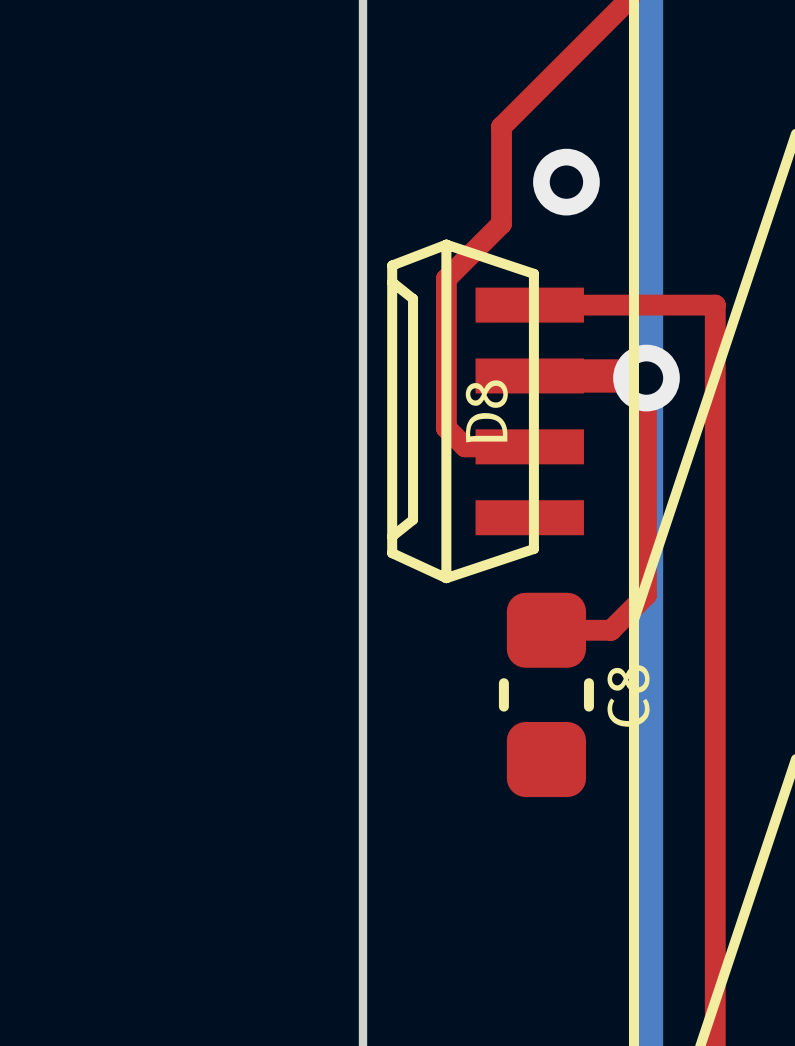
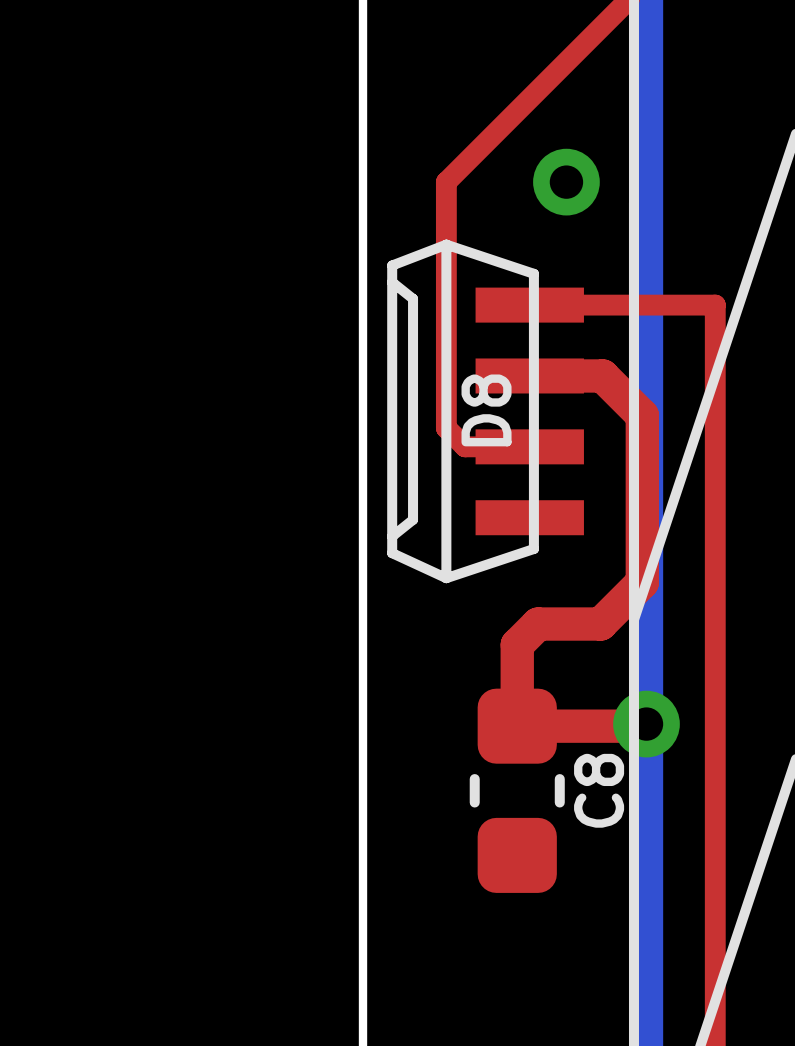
top track: (501, 126) (501, 223) (446, 278) -> (501, 126) (446, 182) (446, 278)
top track: (602, 375) (644, 375) (646, 378) (646, 594) (611, 630) (546, 630) -> (602, 375) (642, 415) (642, 582) (600, 624) (538, 624) (517, 644) (517, 726) (644, 726) (646, 724)
via position: (646, 378) -> (646, 724)
C8 position: (546, 694) -> (517, 790)

